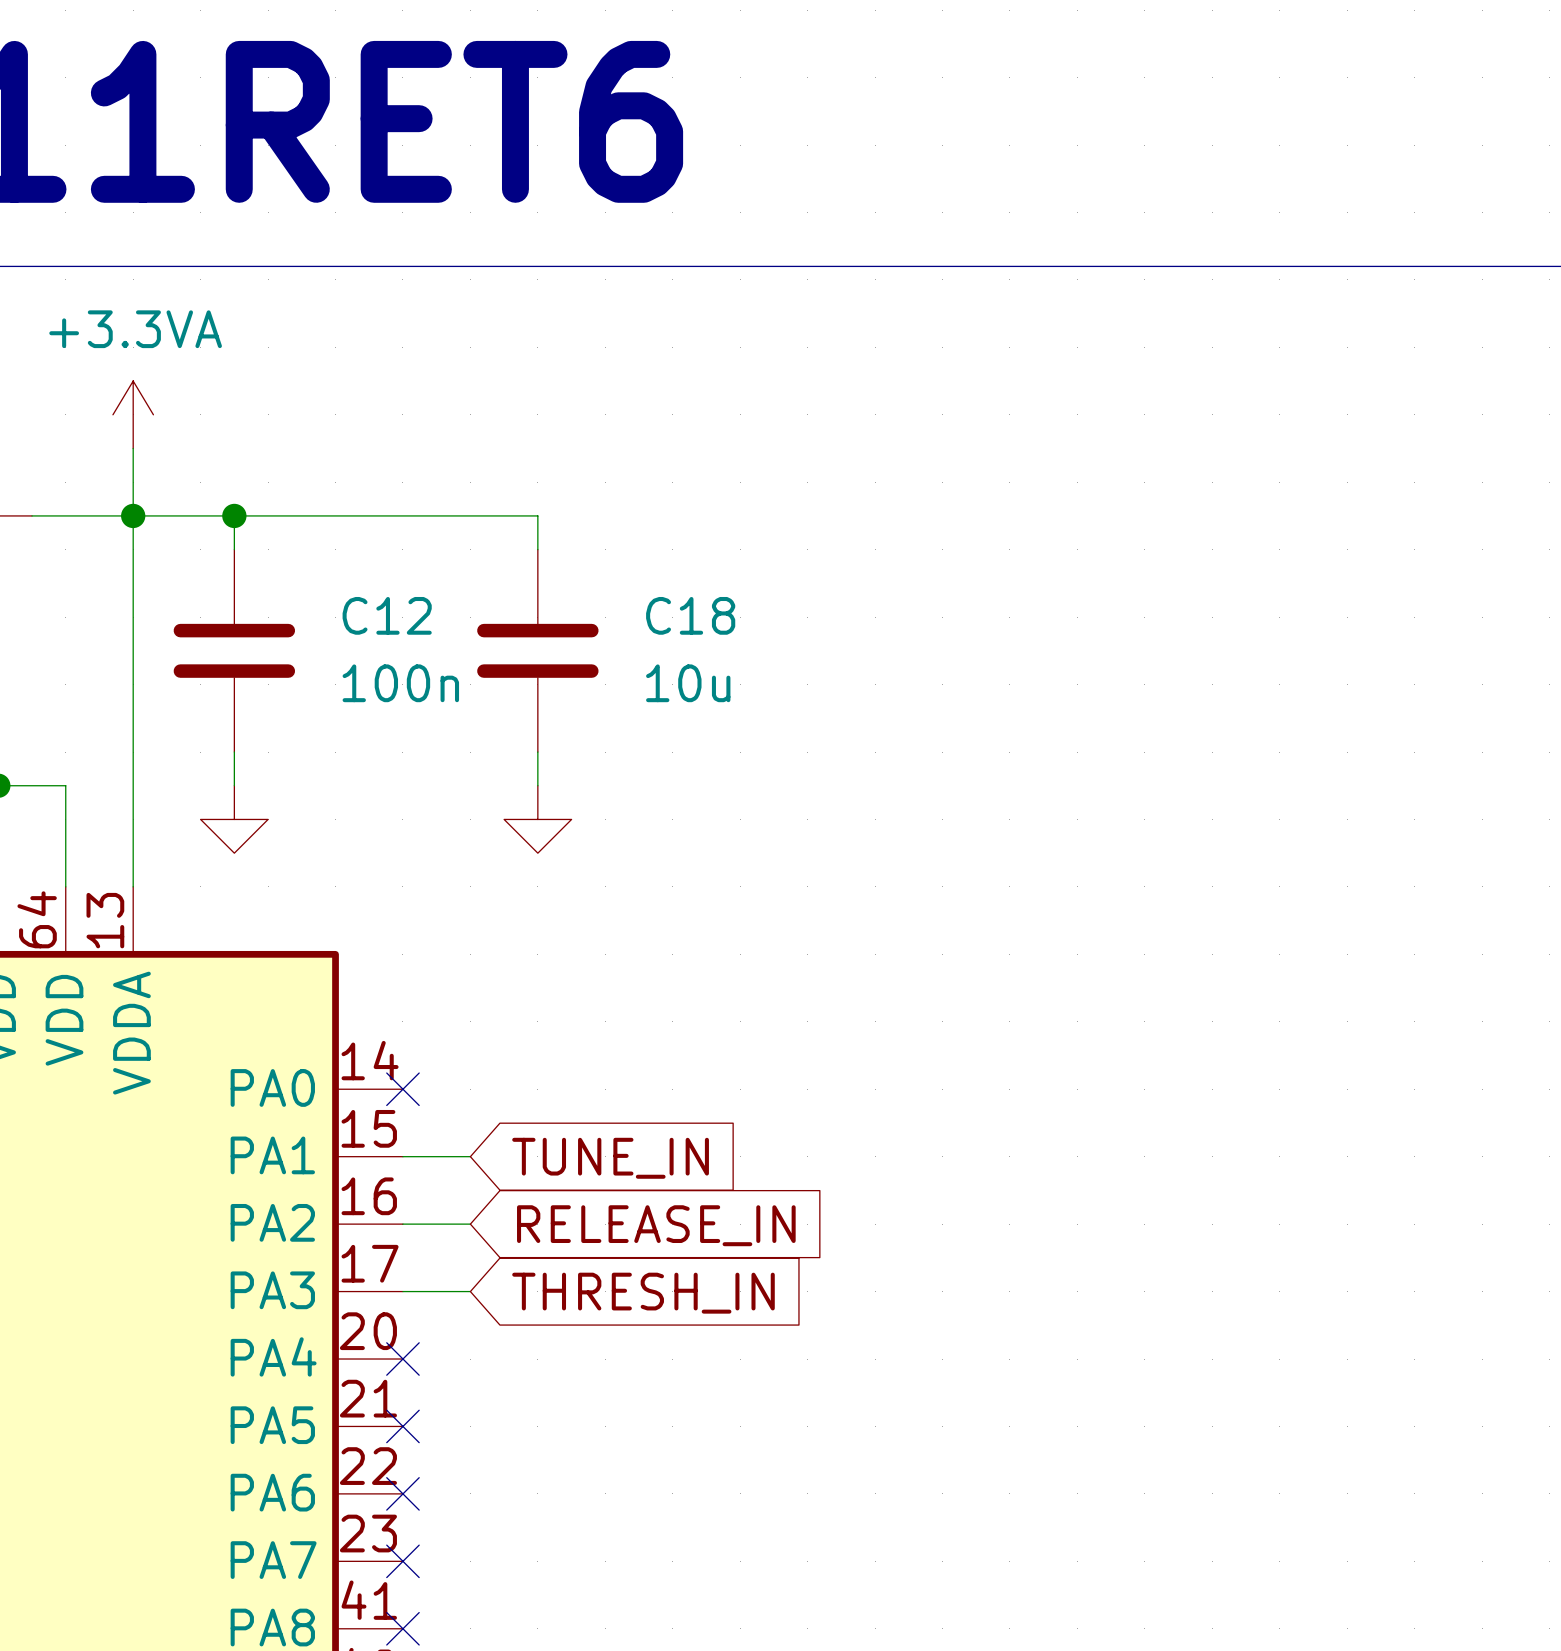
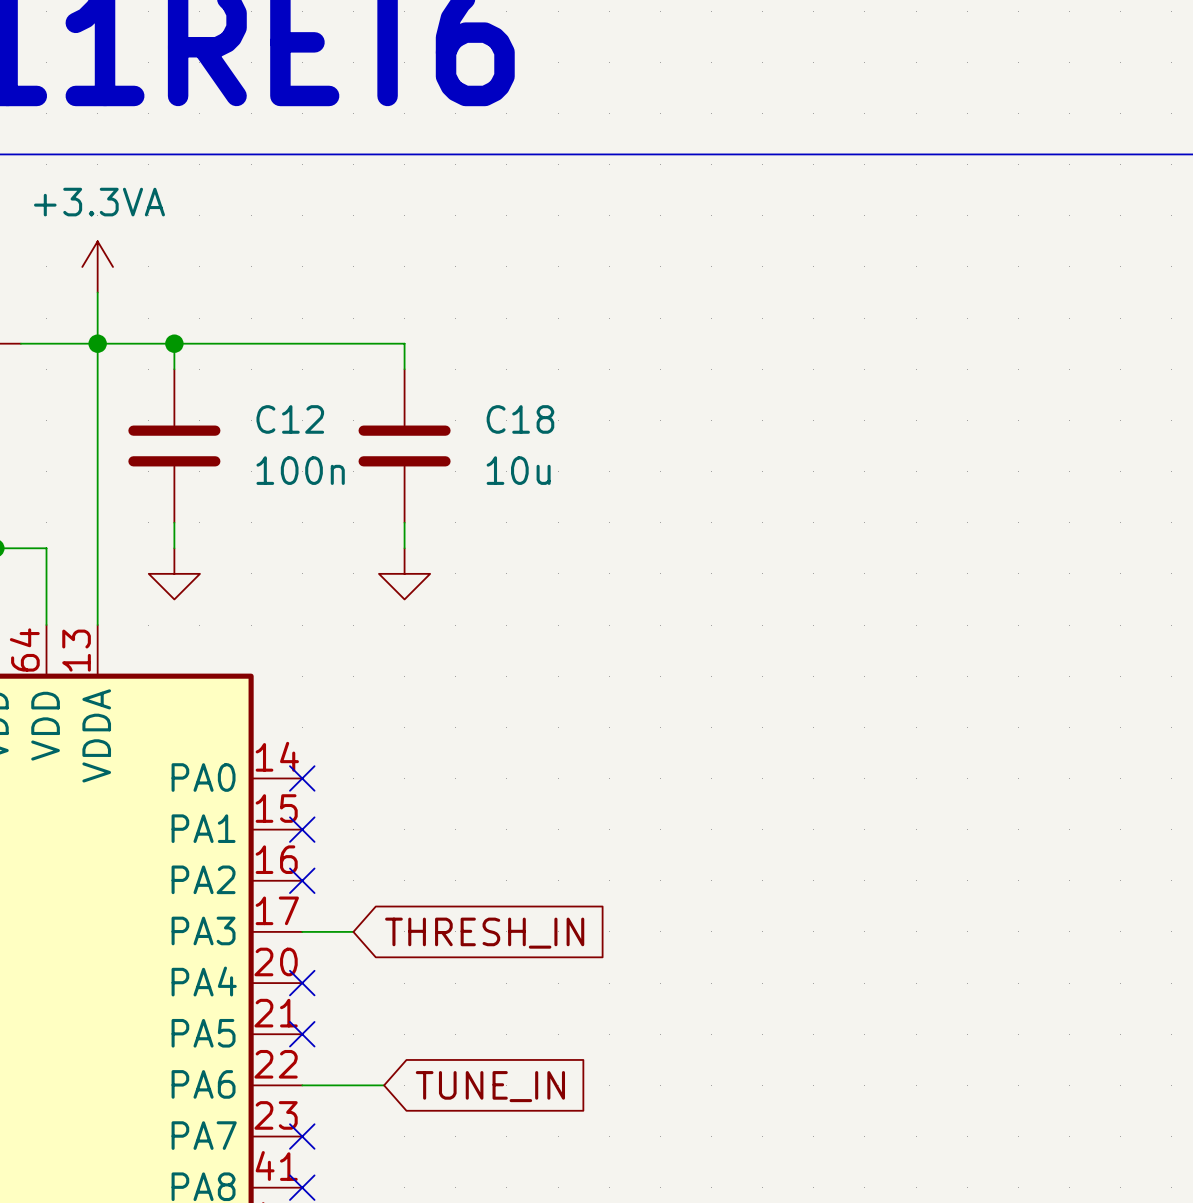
wire: (402, 1156) (470, 1156) -> none
no-connect mark: none -> (302, 829)
global label position: TUNE_IN (610, 1158) -> TUNE_IN (490, 1086)
wire: (402, 1224) (470, 1224) -> none
no-connect mark: none -> (302, 880)
global label: RELEASE_IN (656, 1225) -> none
wire: none -> (302, 1085) (384, 1085)
no-connect mark: (402, 1493) -> none

